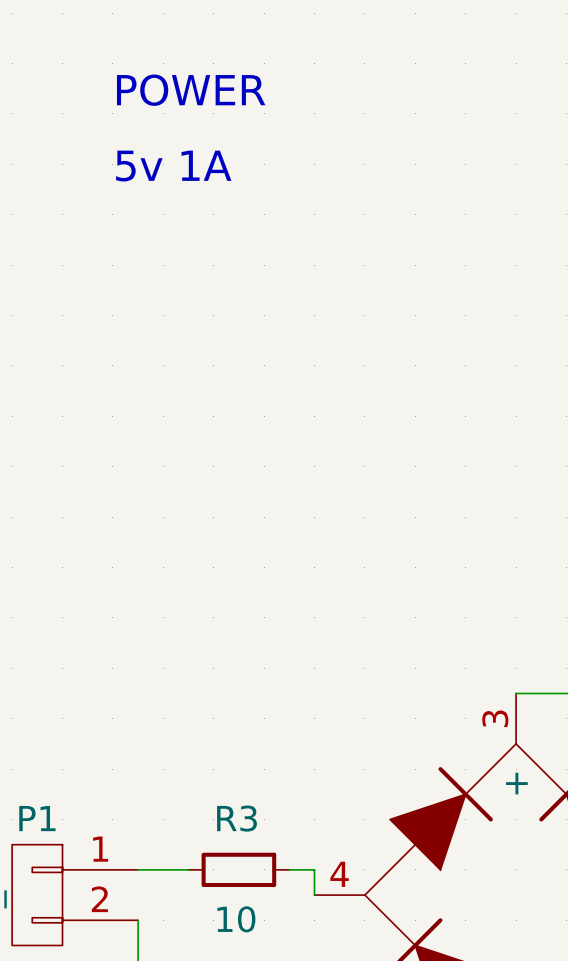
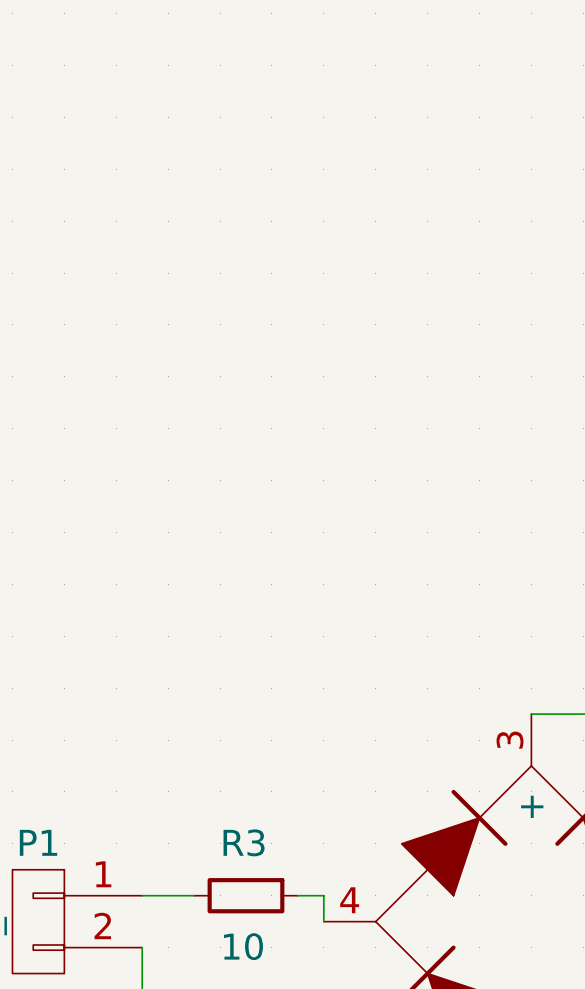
text: POWER (191, 90) -> none
text: 5v 1A (173, 166) -> none

